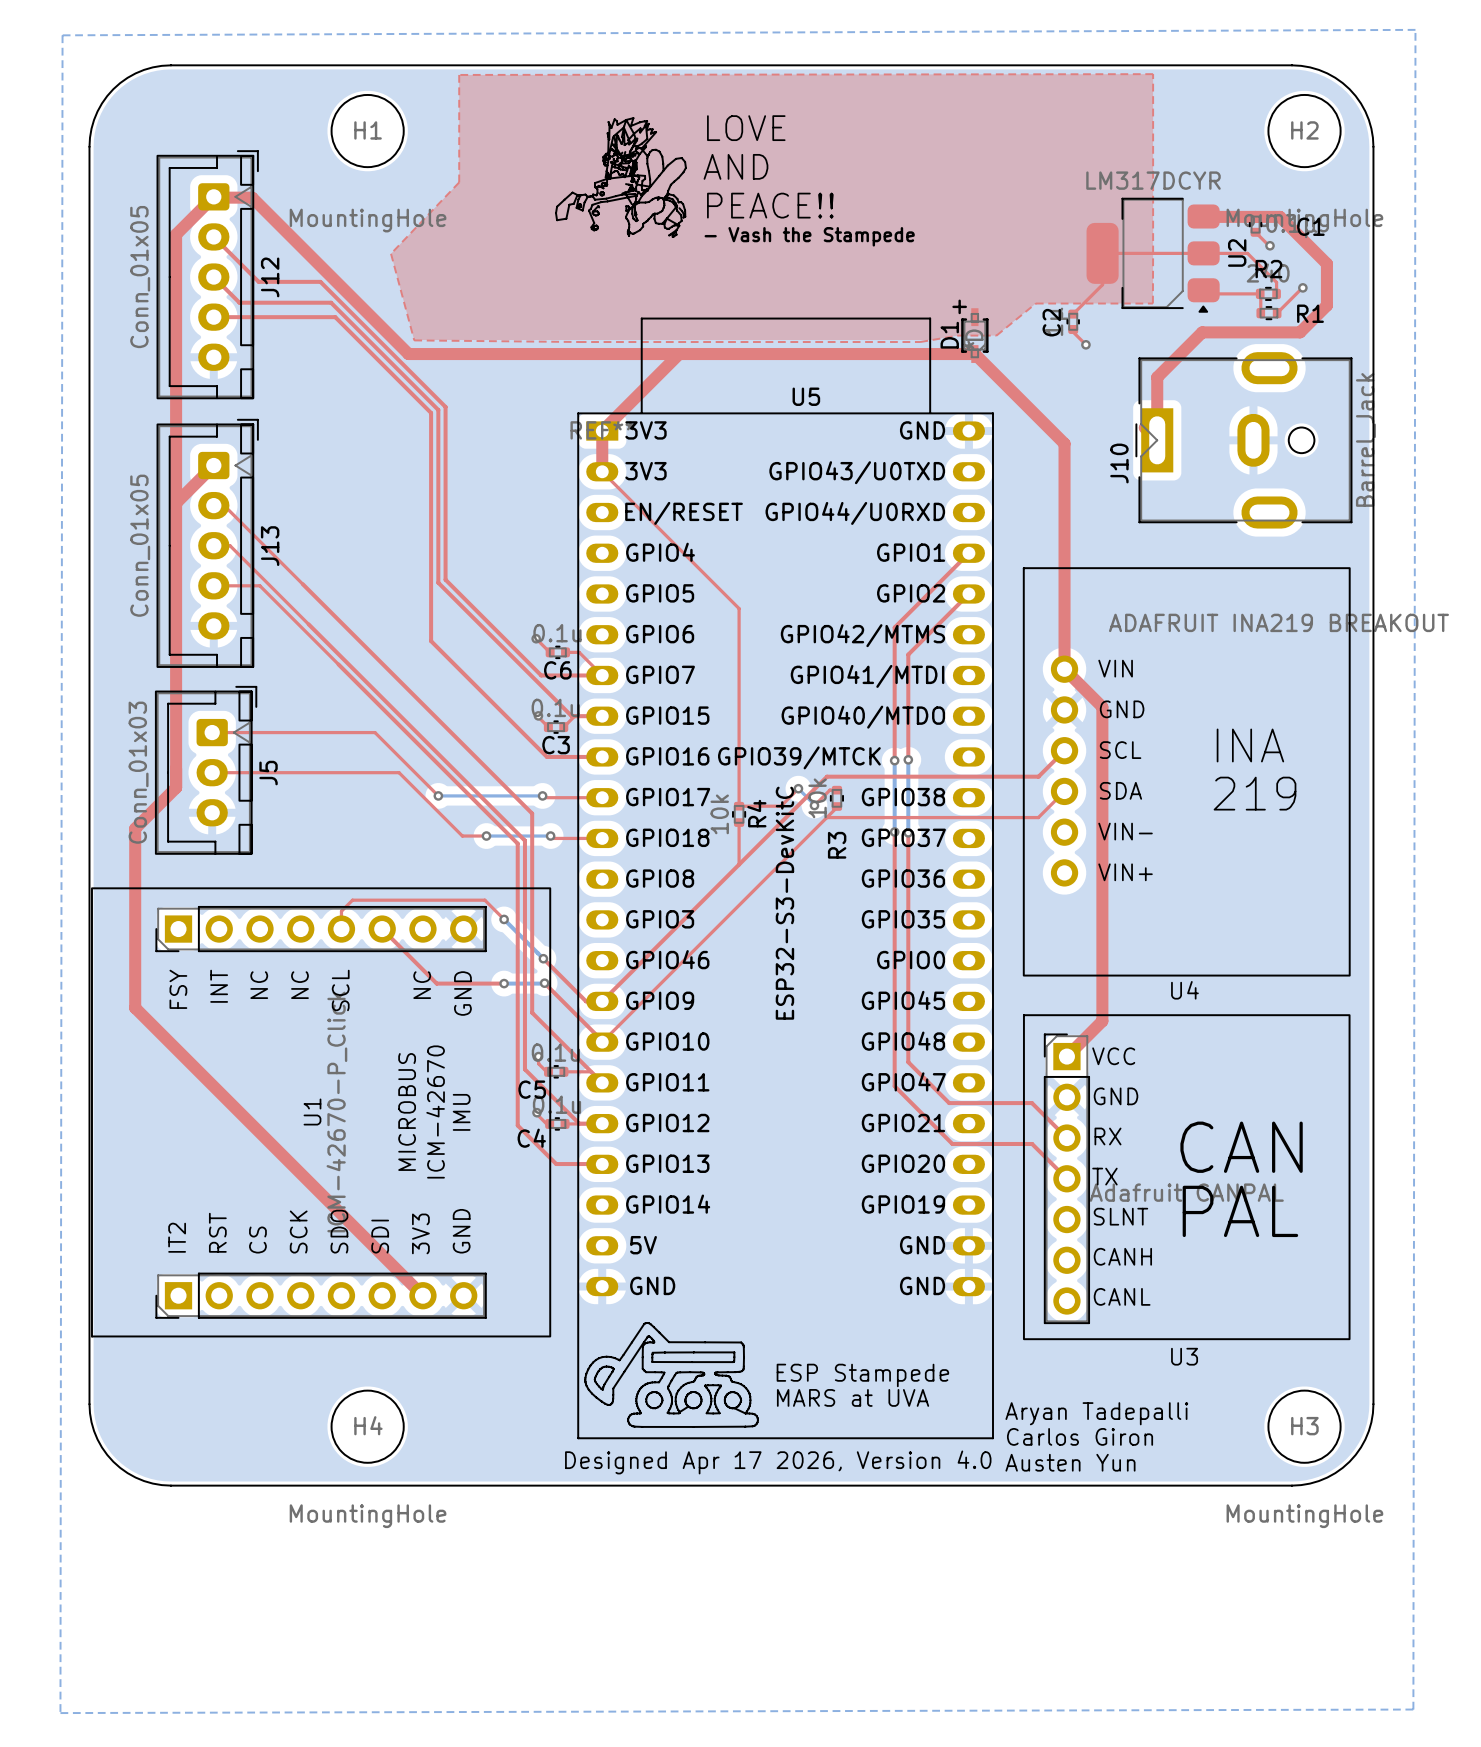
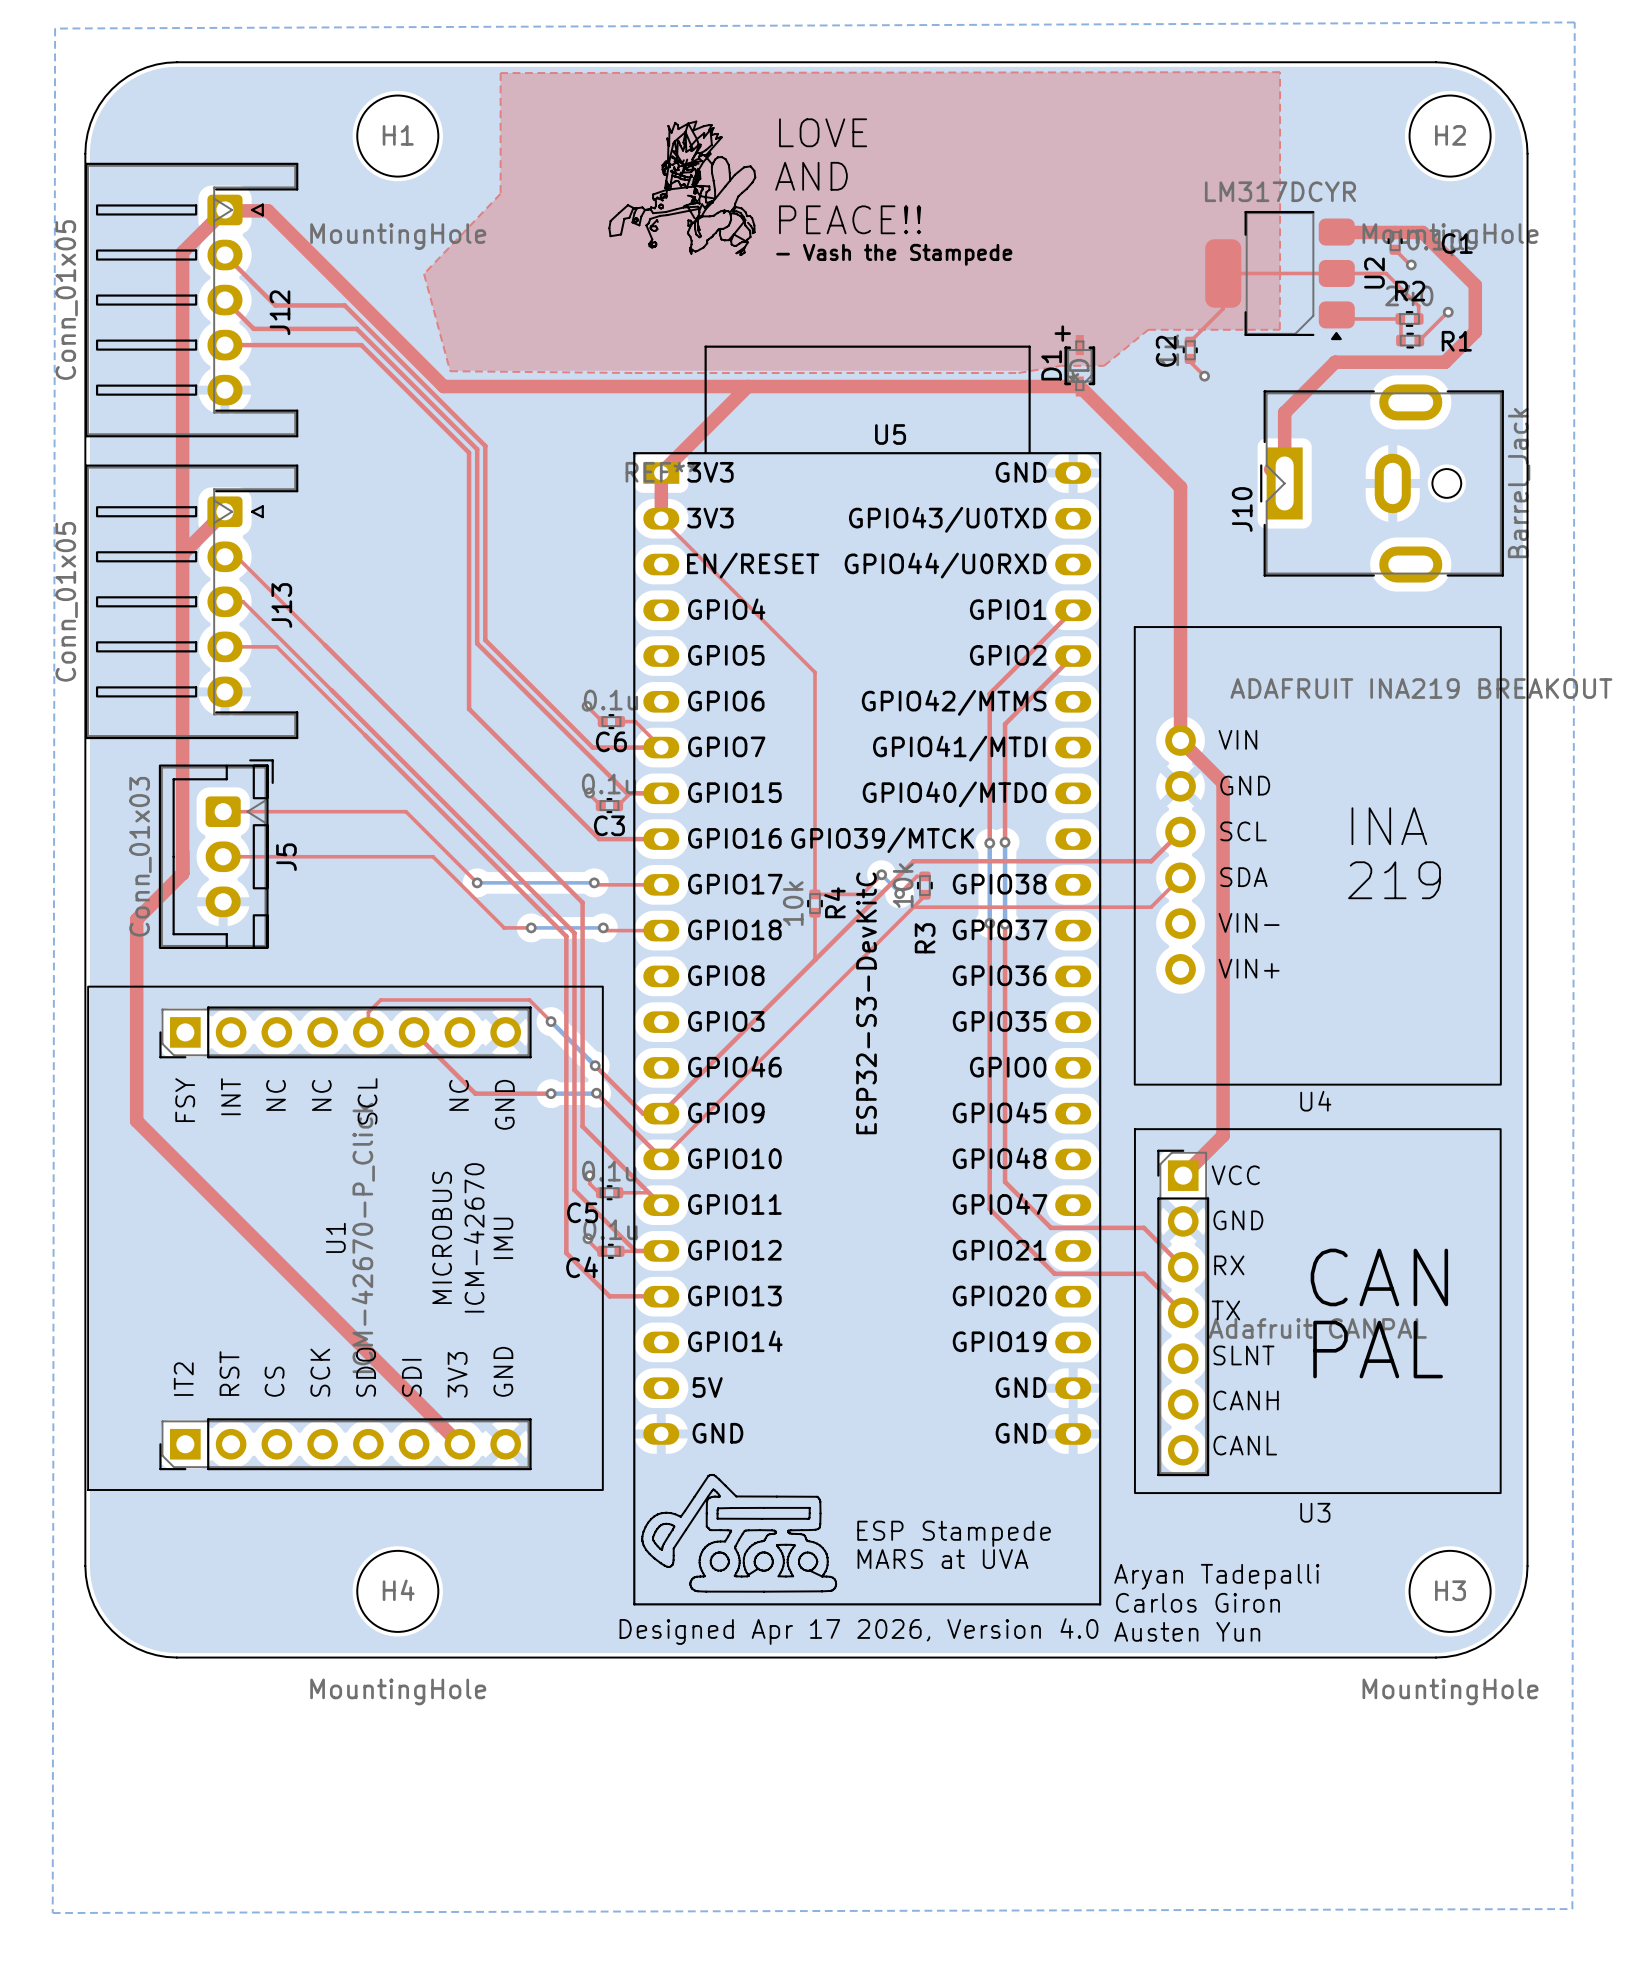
J12 footprint: [156, 150, 259, 400] -> [84, 162, 299, 438]
J12 value position: Conn_01x05 (140, 277) -> Conn_01x05 (66, 300)
J13 footprint: [156, 418, 259, 668] -> [84, 464, 299, 740]
J13 value position: Conn_01x05 (140, 545) -> Conn_01x05 (66, 601)

